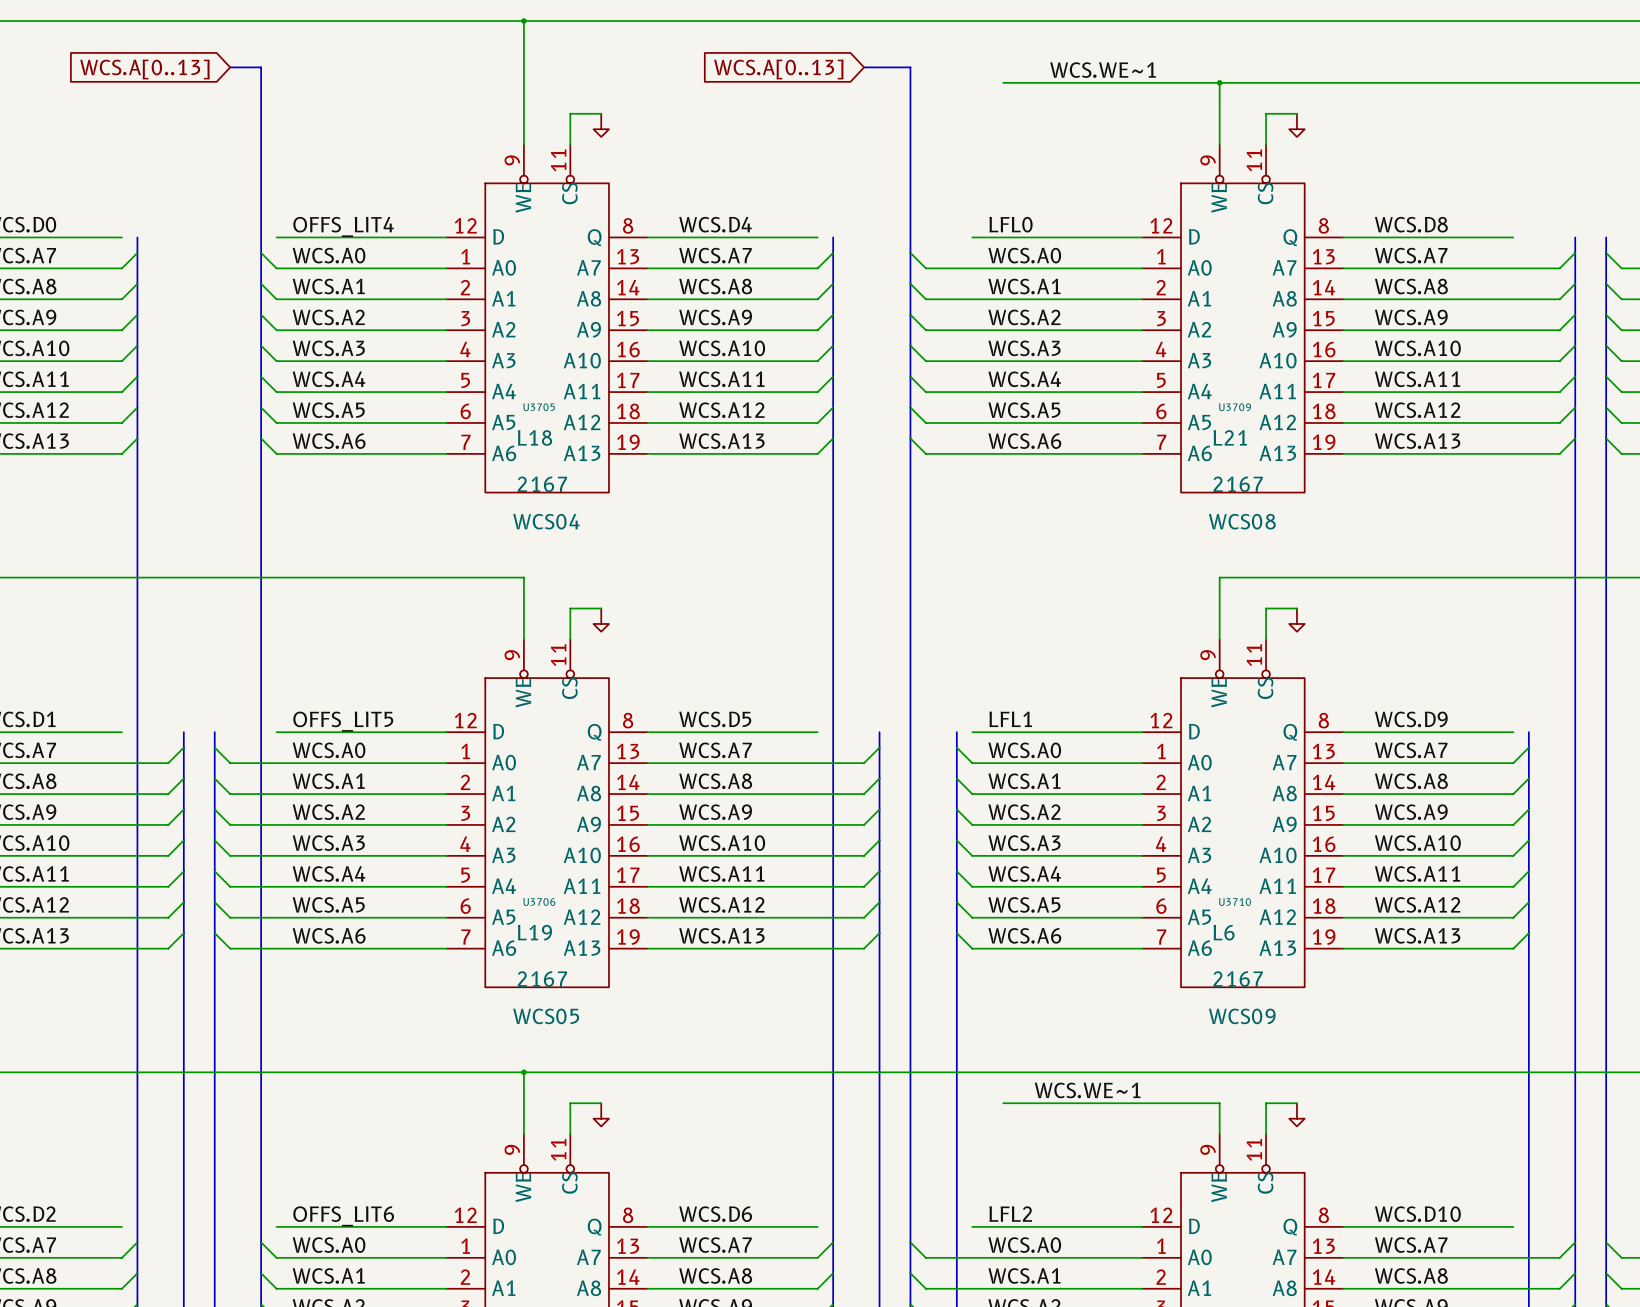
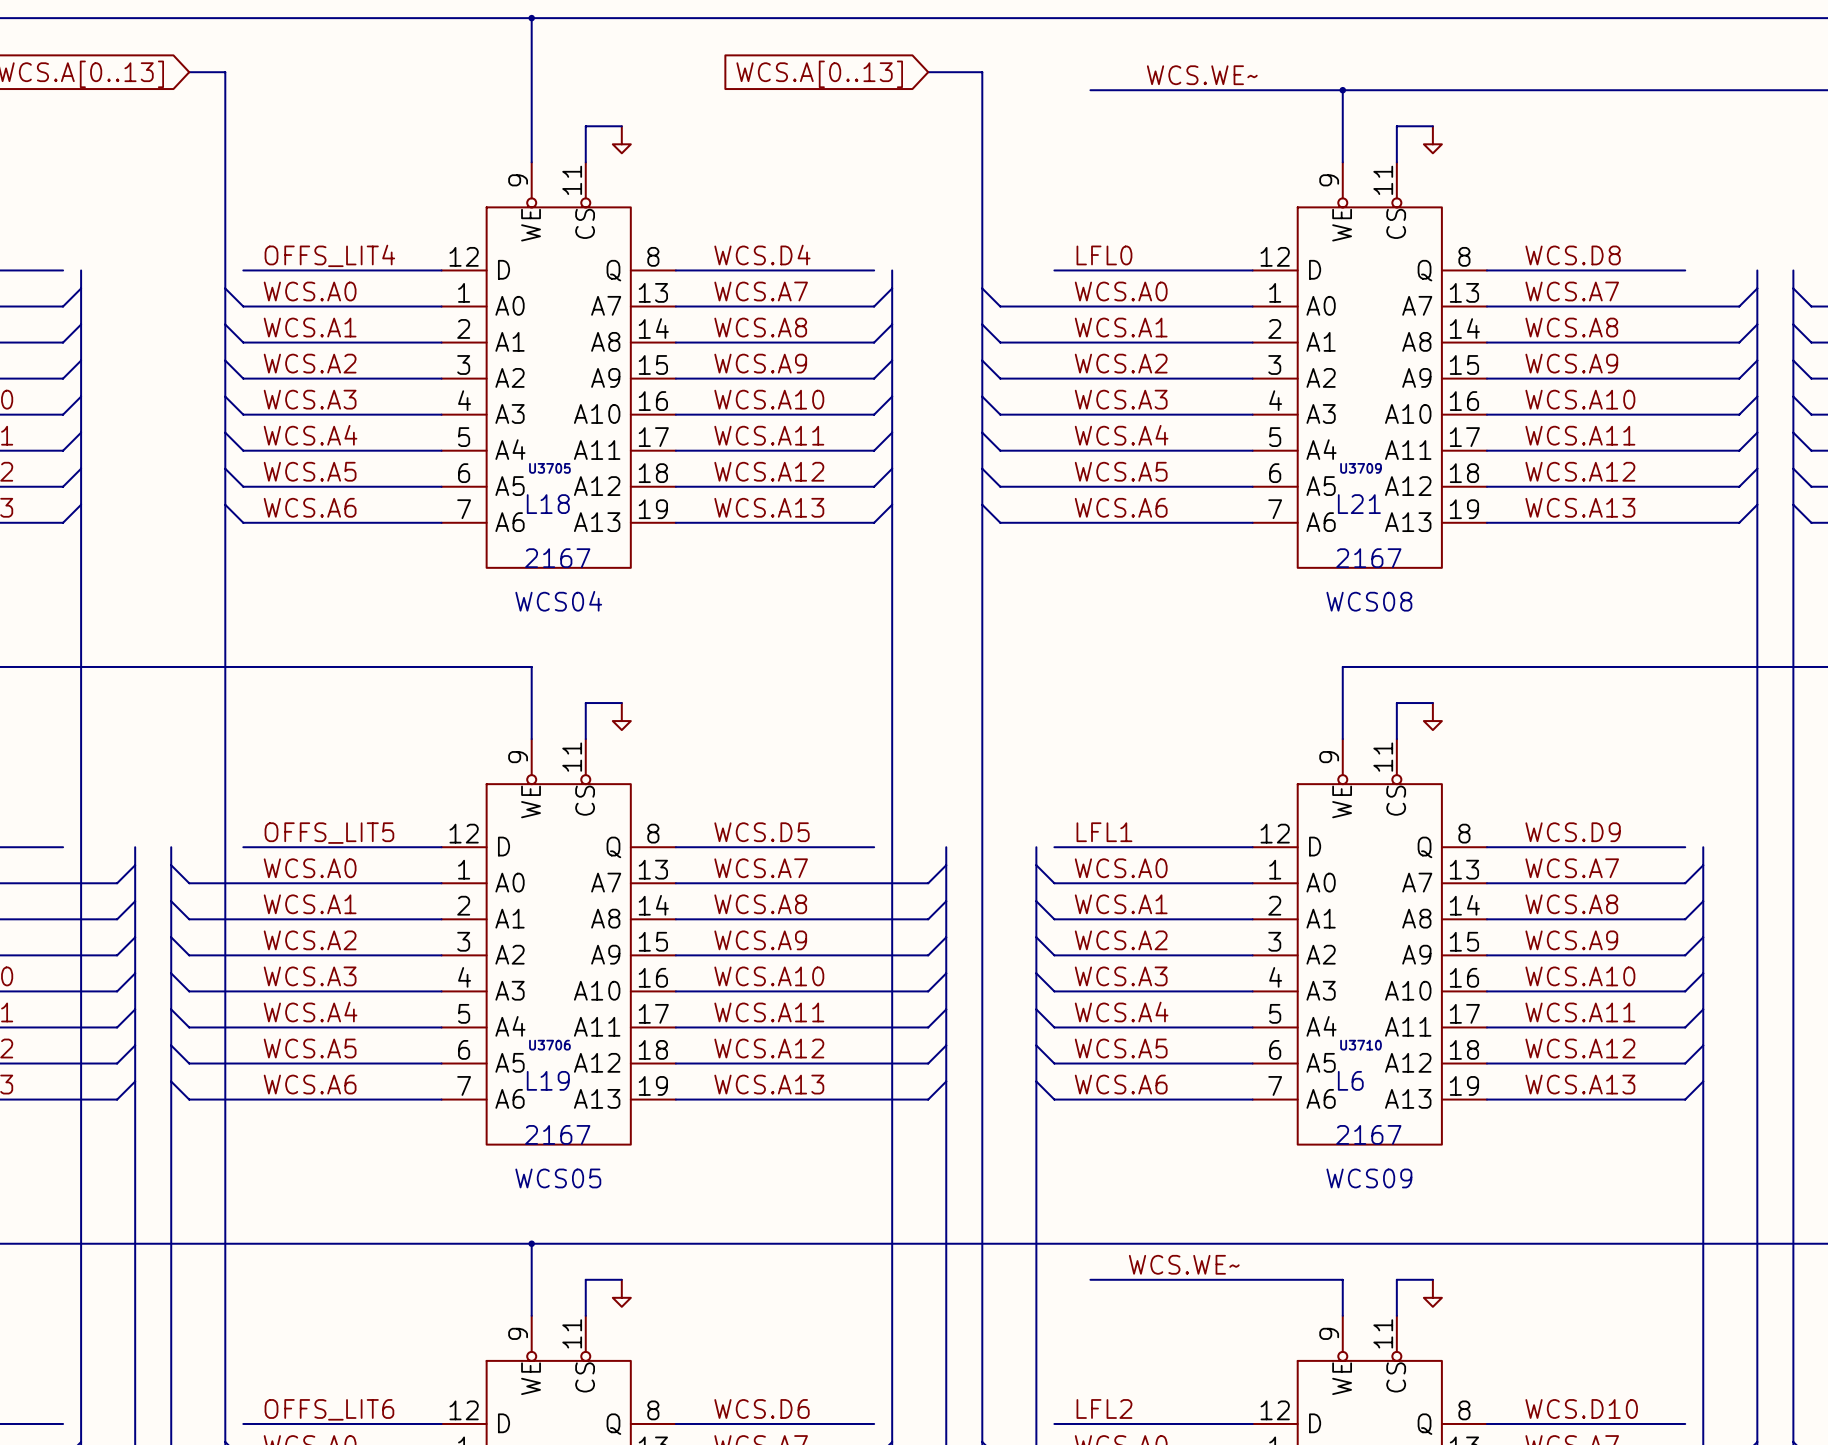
label: WCS.WE~1 (1103, 70) -> WCS.WE~ (1202, 75)
label: WCS.WE~1 (1087, 1090) -> WCS.WE~ (1184, 1264)

